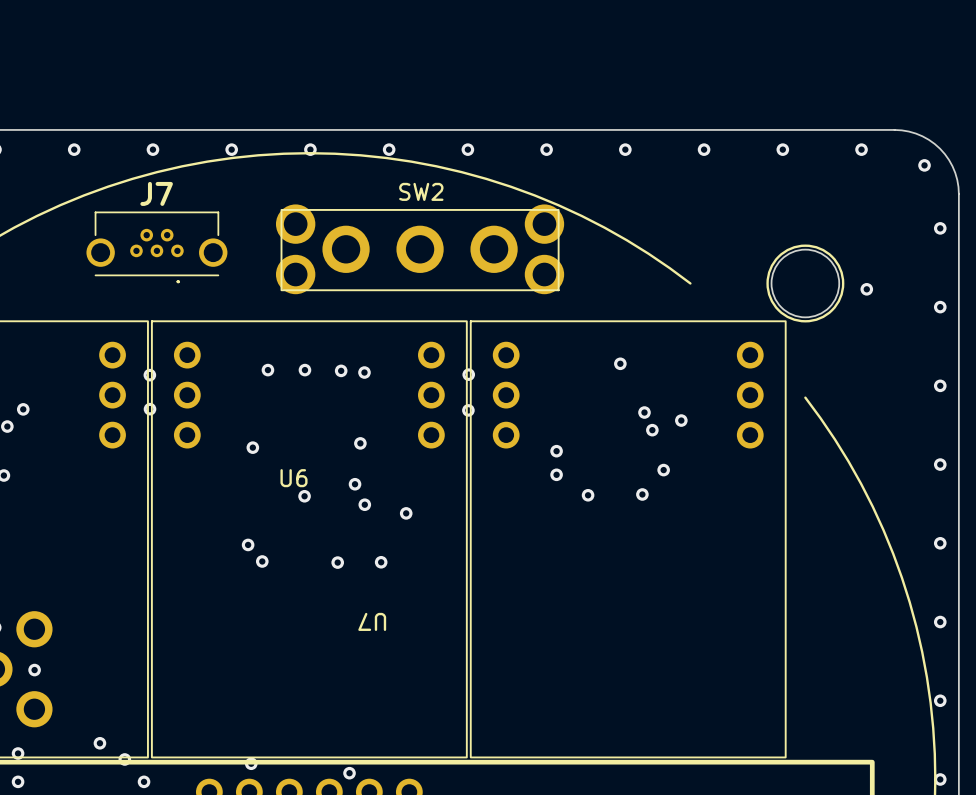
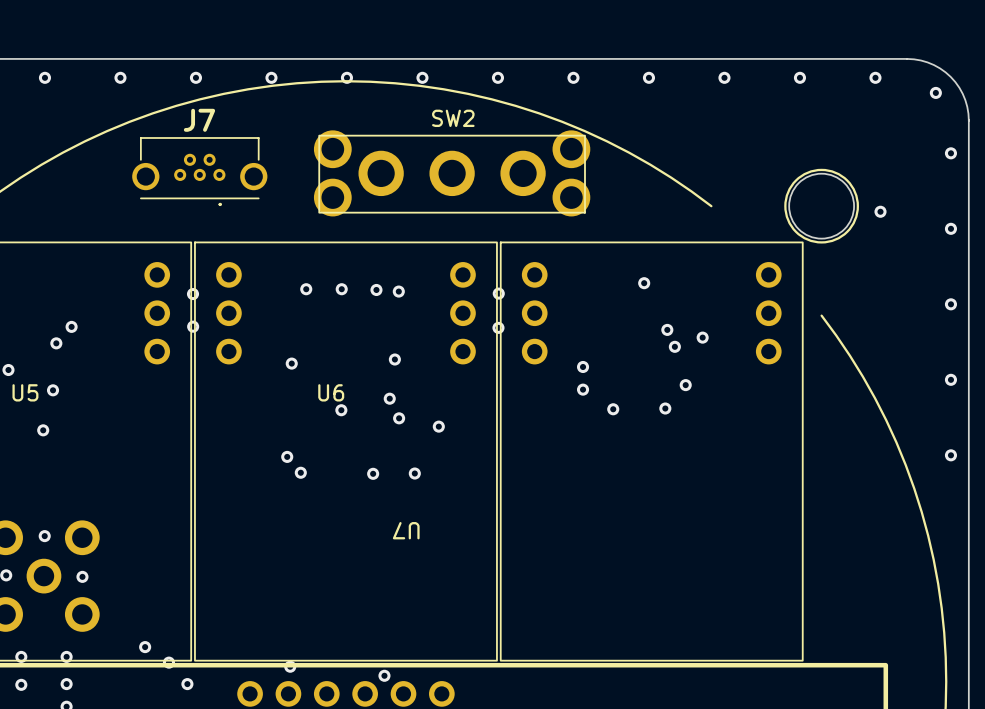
via: (940, 622) -> none
via: (940, 700) -> none
via: (940, 779) -> none

